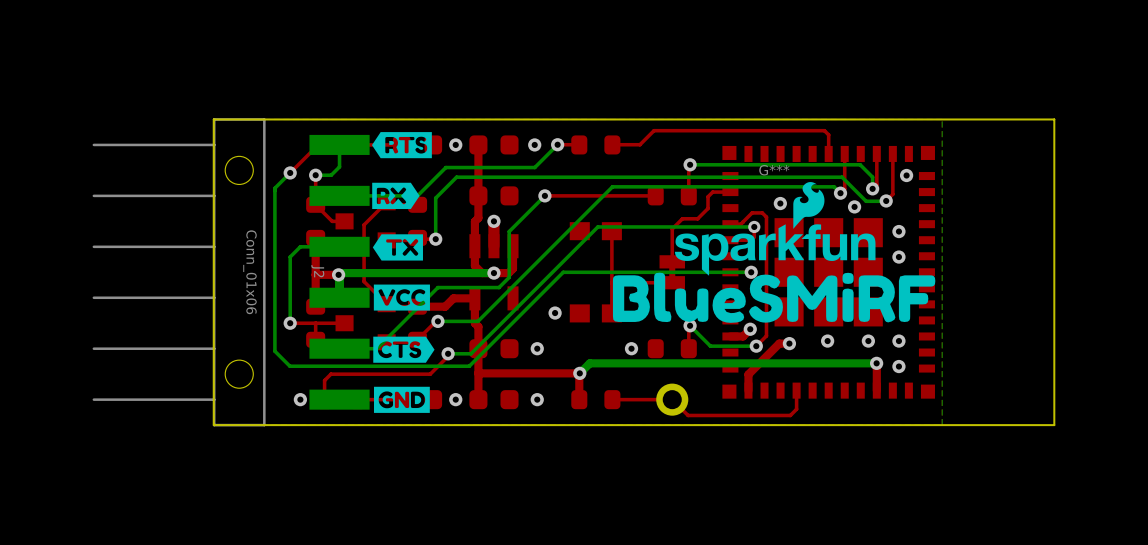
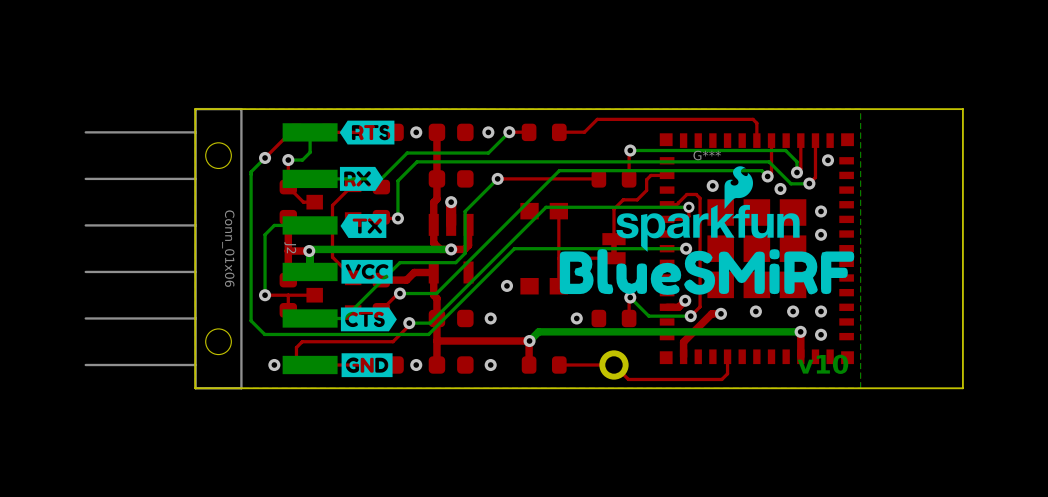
text: none -> v10 (822, 364)

